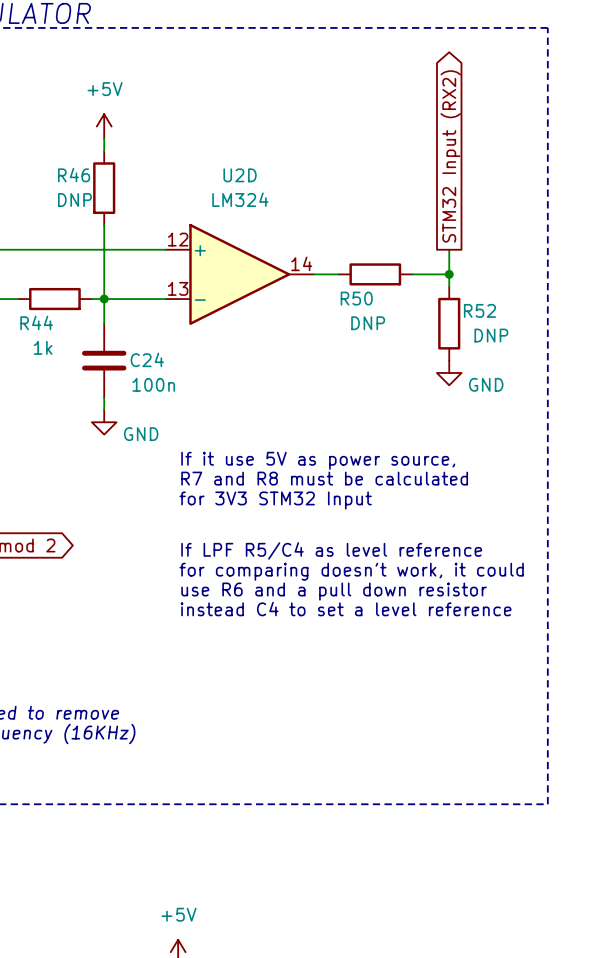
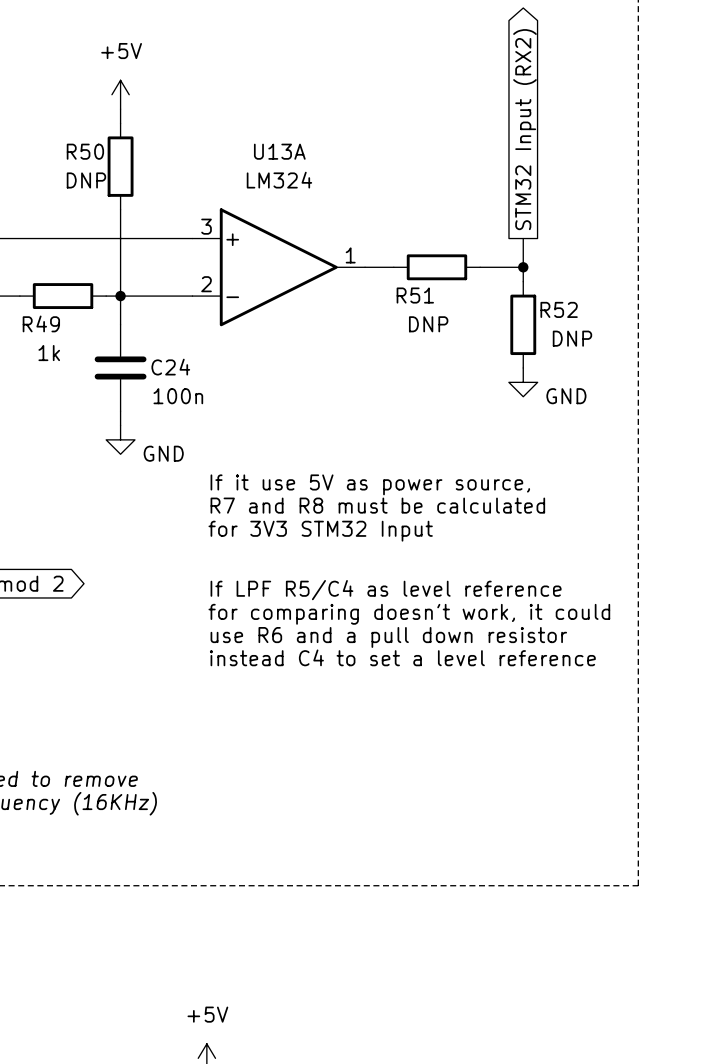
R46 name: R46 (74, 175) -> R50 (85, 151)
U2D name: U2D (240, 175) -> U13A (279, 151)
U2D pin number: 12 (178, 239) -> 3 (206, 226)
U2D pin number: 14 (301, 263) -> 1 (350, 255)
U2D pin number: 13 (178, 288) -> 2 (206, 284)
R50 name: R50 (356, 298) -> R51 (415, 295)
R44 name: R44 (36, 322) -> R49 (41, 323)

